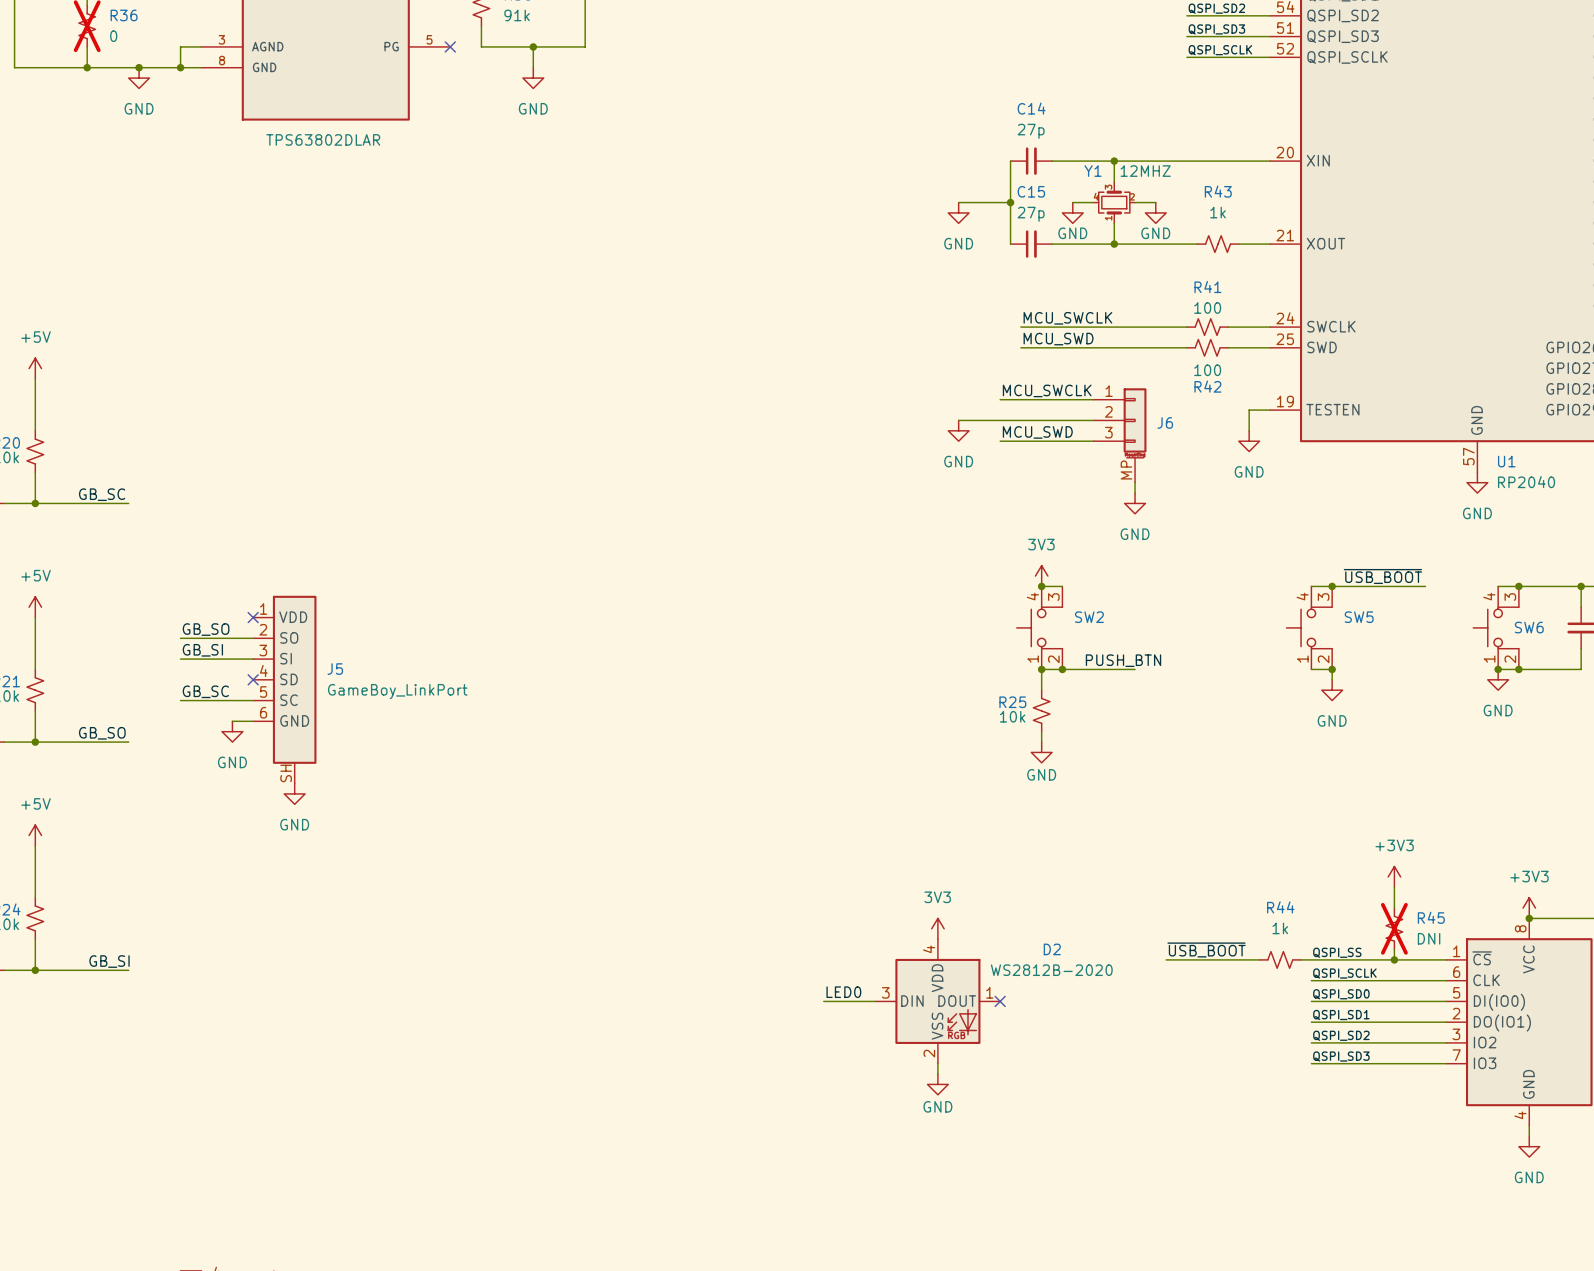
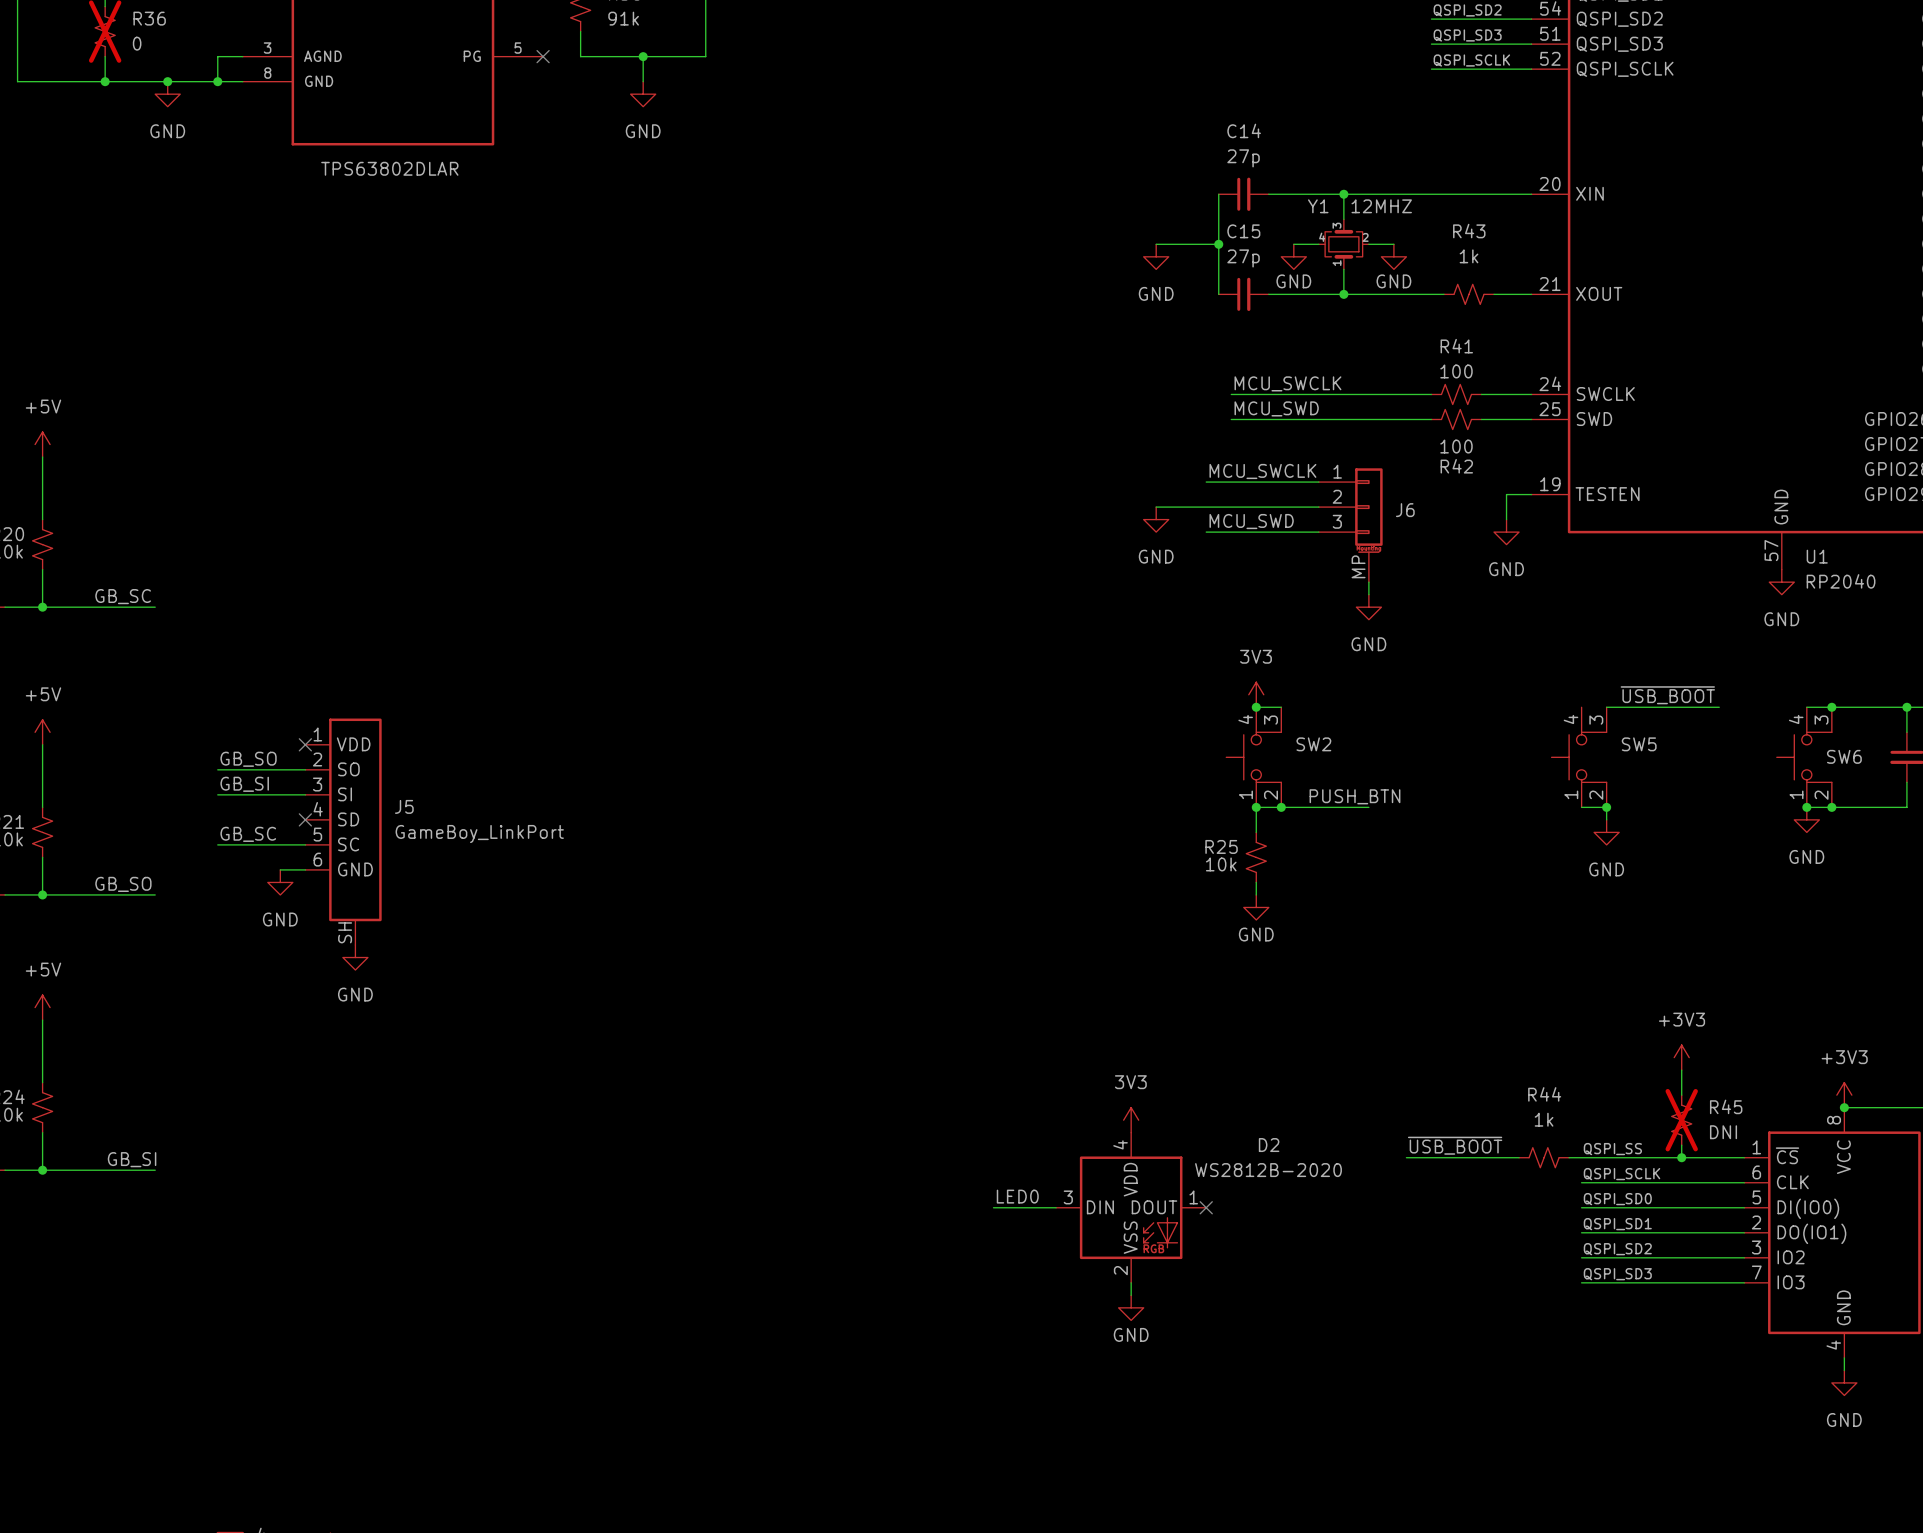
wire: (1311, 586) (1332, 586) -> none
junction: (1332, 586) -> none

